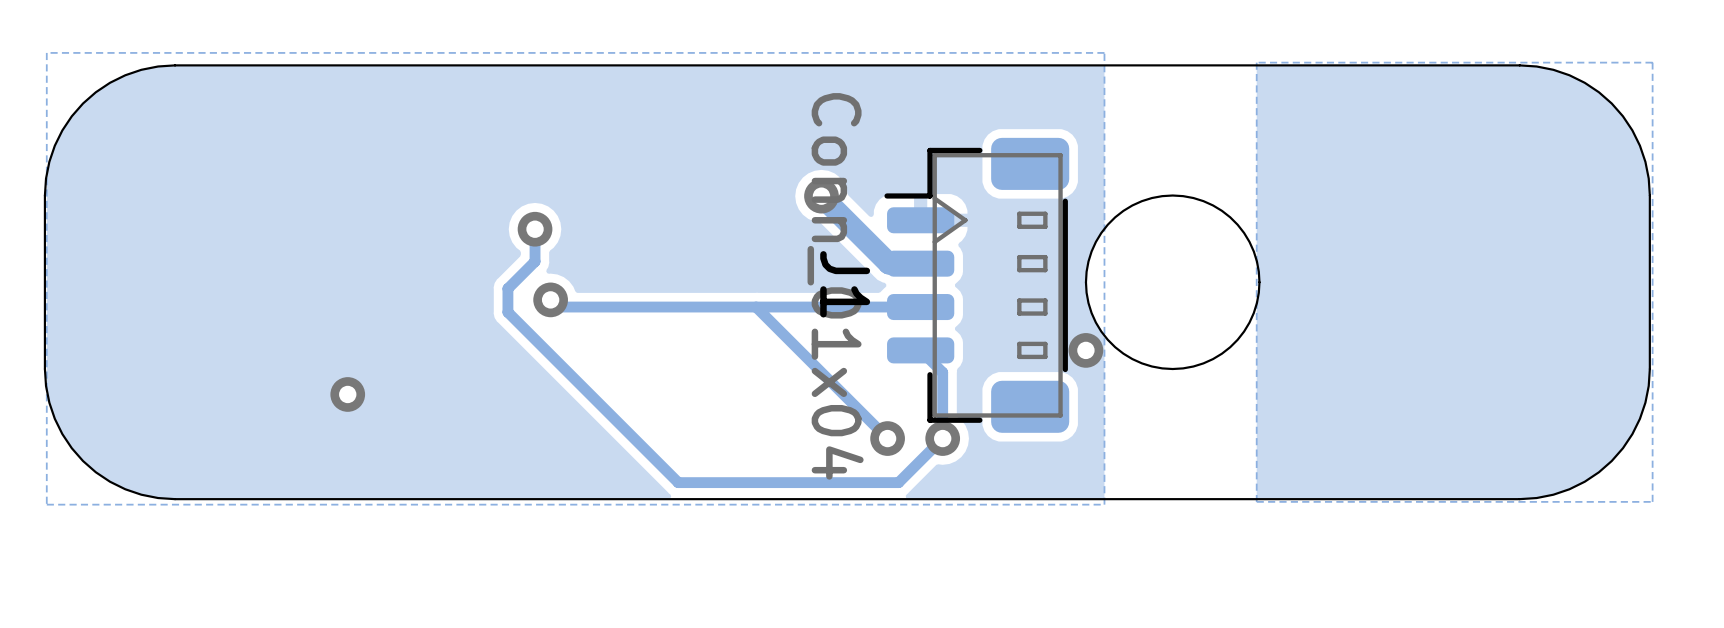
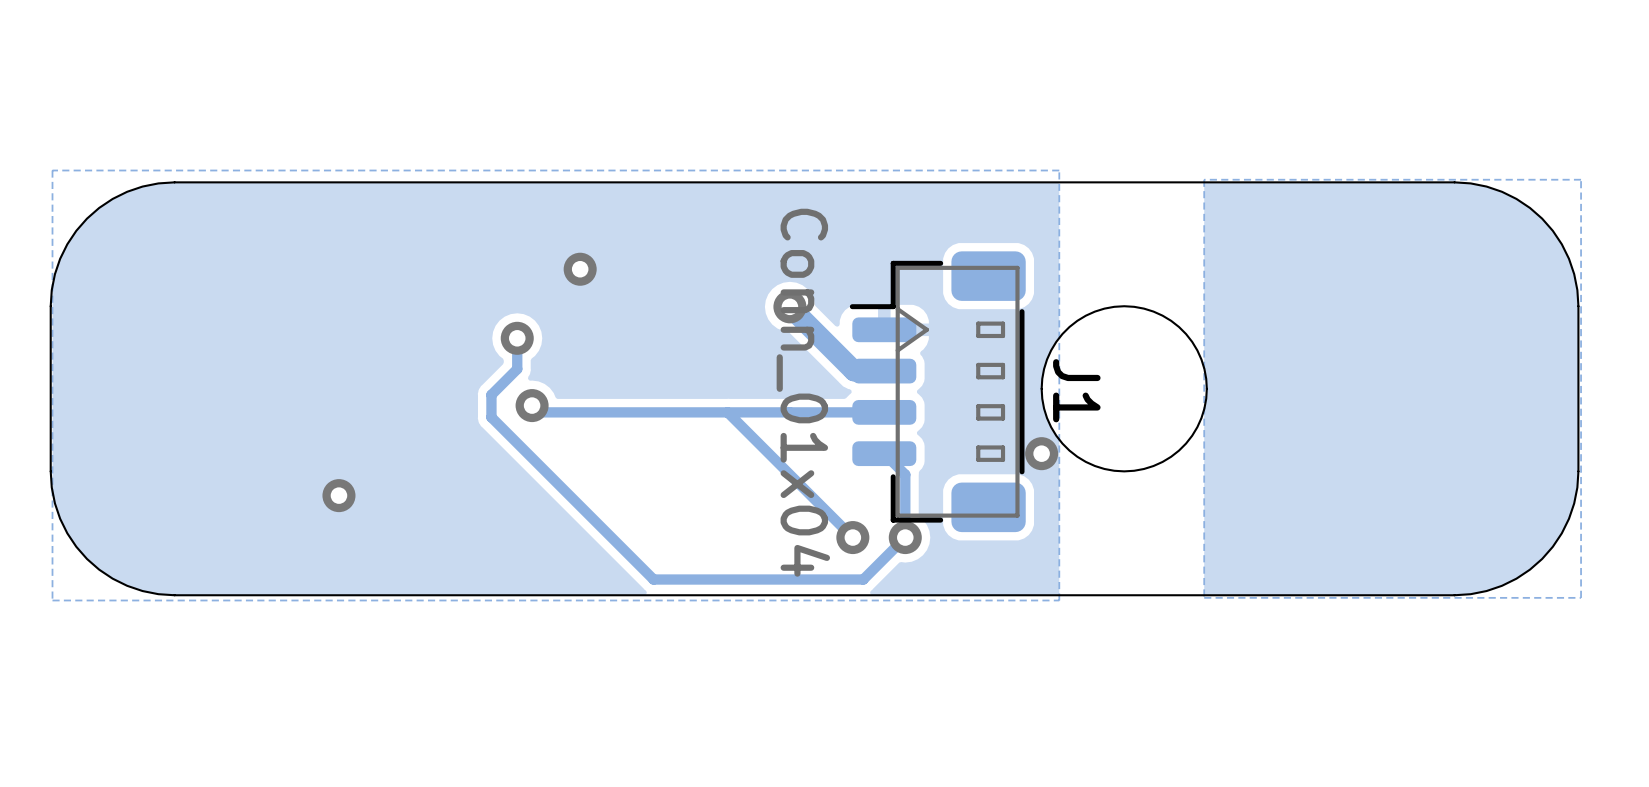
via: none -> (580, 269)
J1 name position: J1 (845, 284) -> J1 (1076, 390)

